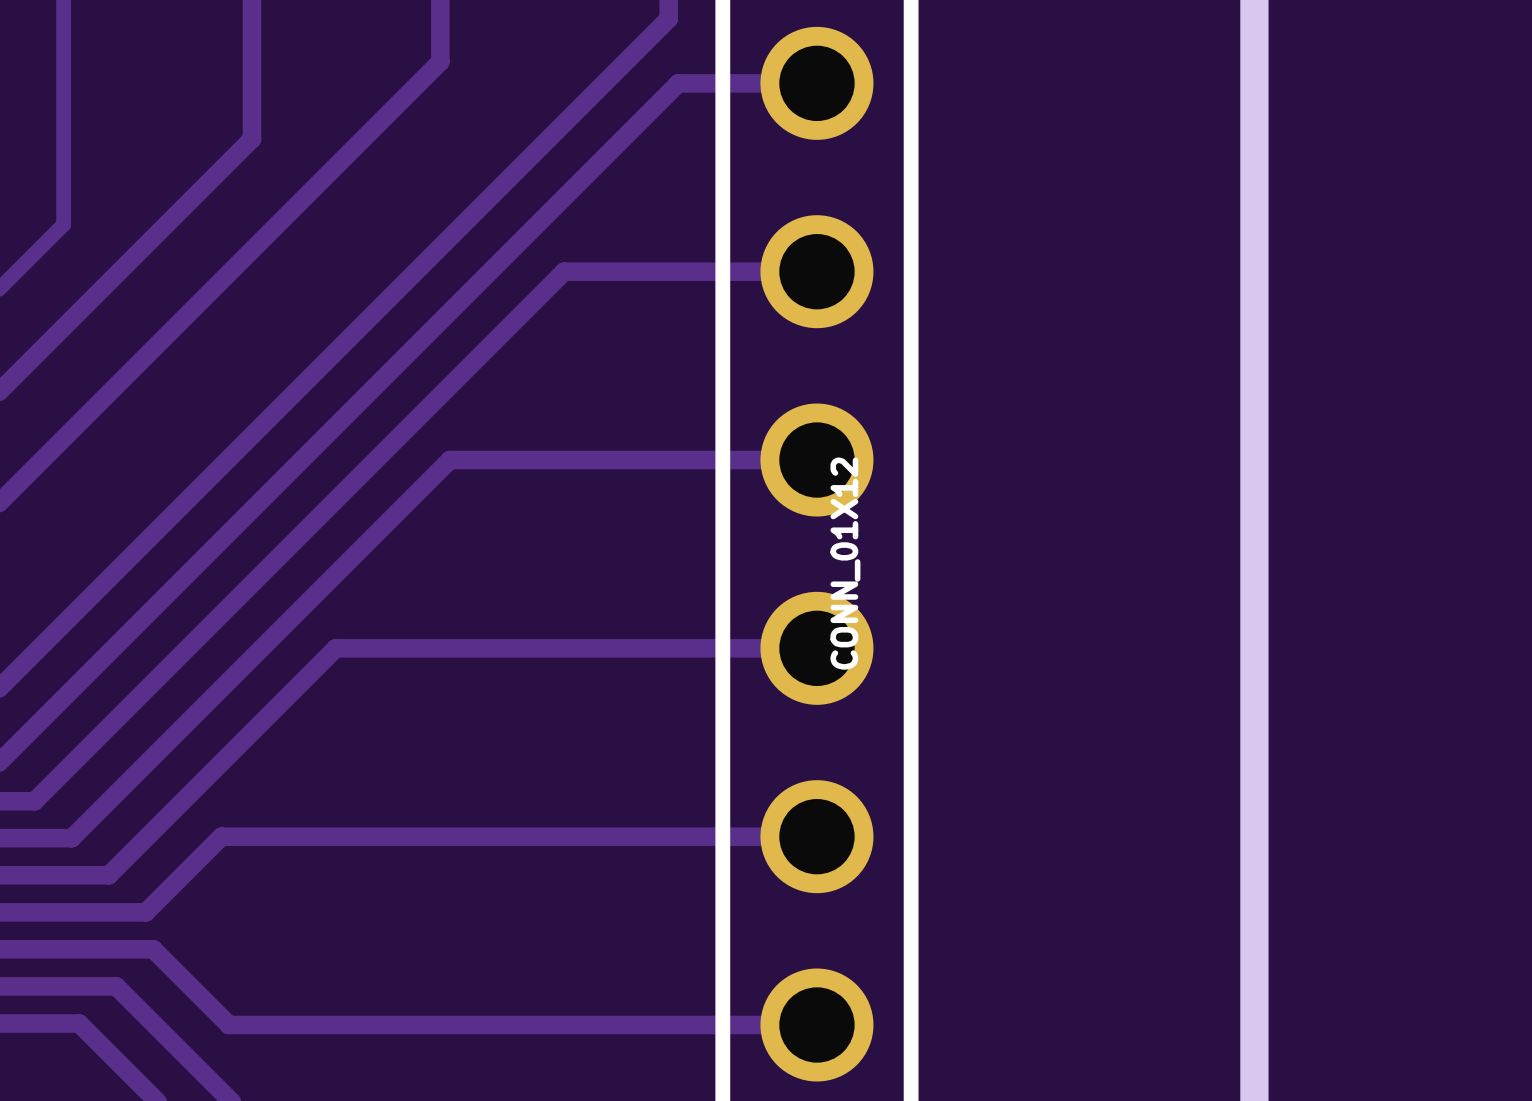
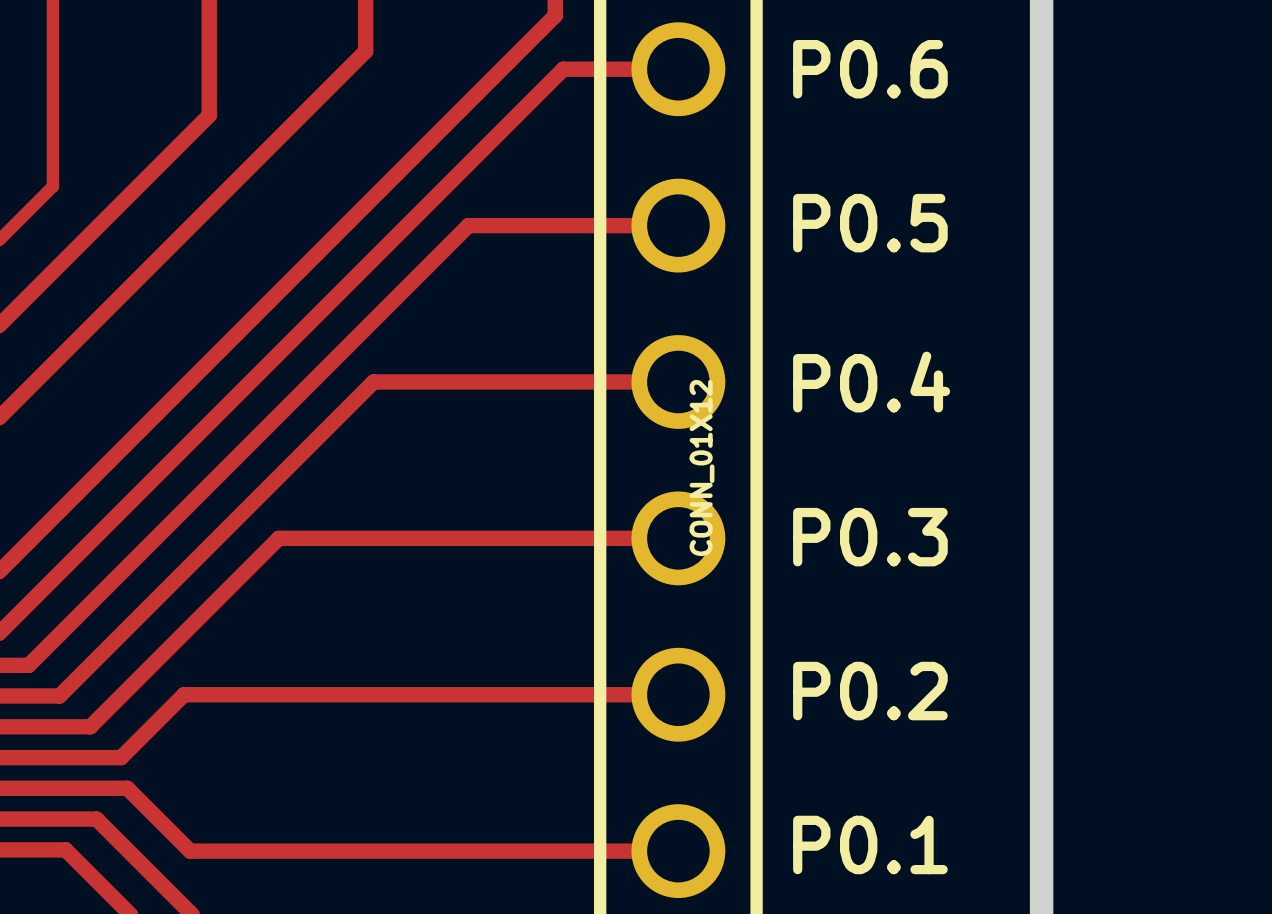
text: none -> P0.6 (870, 69)
text: none -> P0.5 (870, 223)
text: none -> P0.4 (871, 382)
text: none -> P0.3 (870, 537)
text: none -> P0.2 (870, 691)
text: none -> P0.1 (870, 844)

